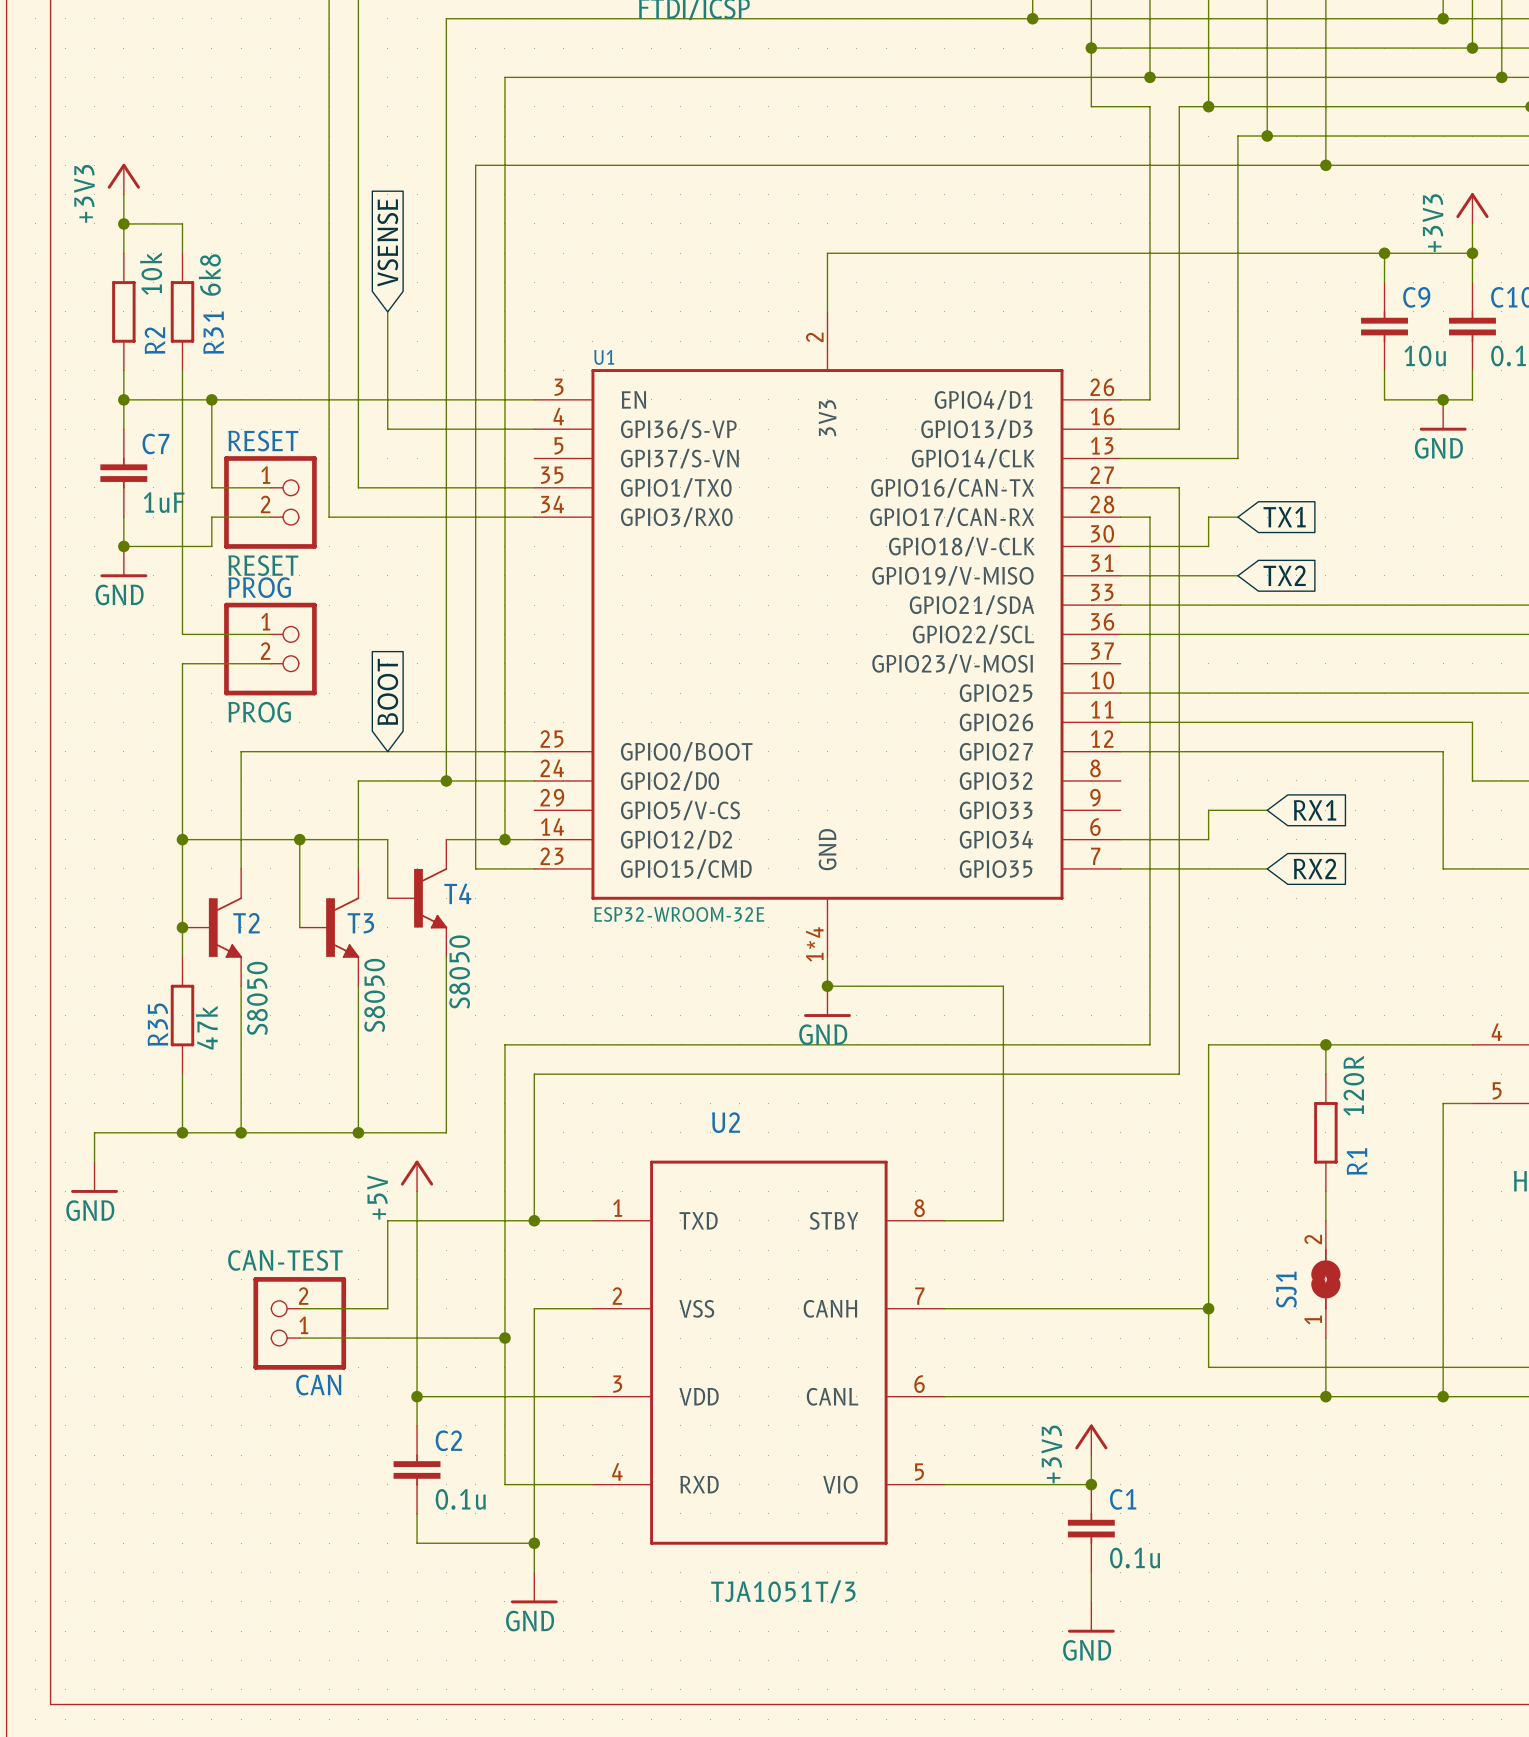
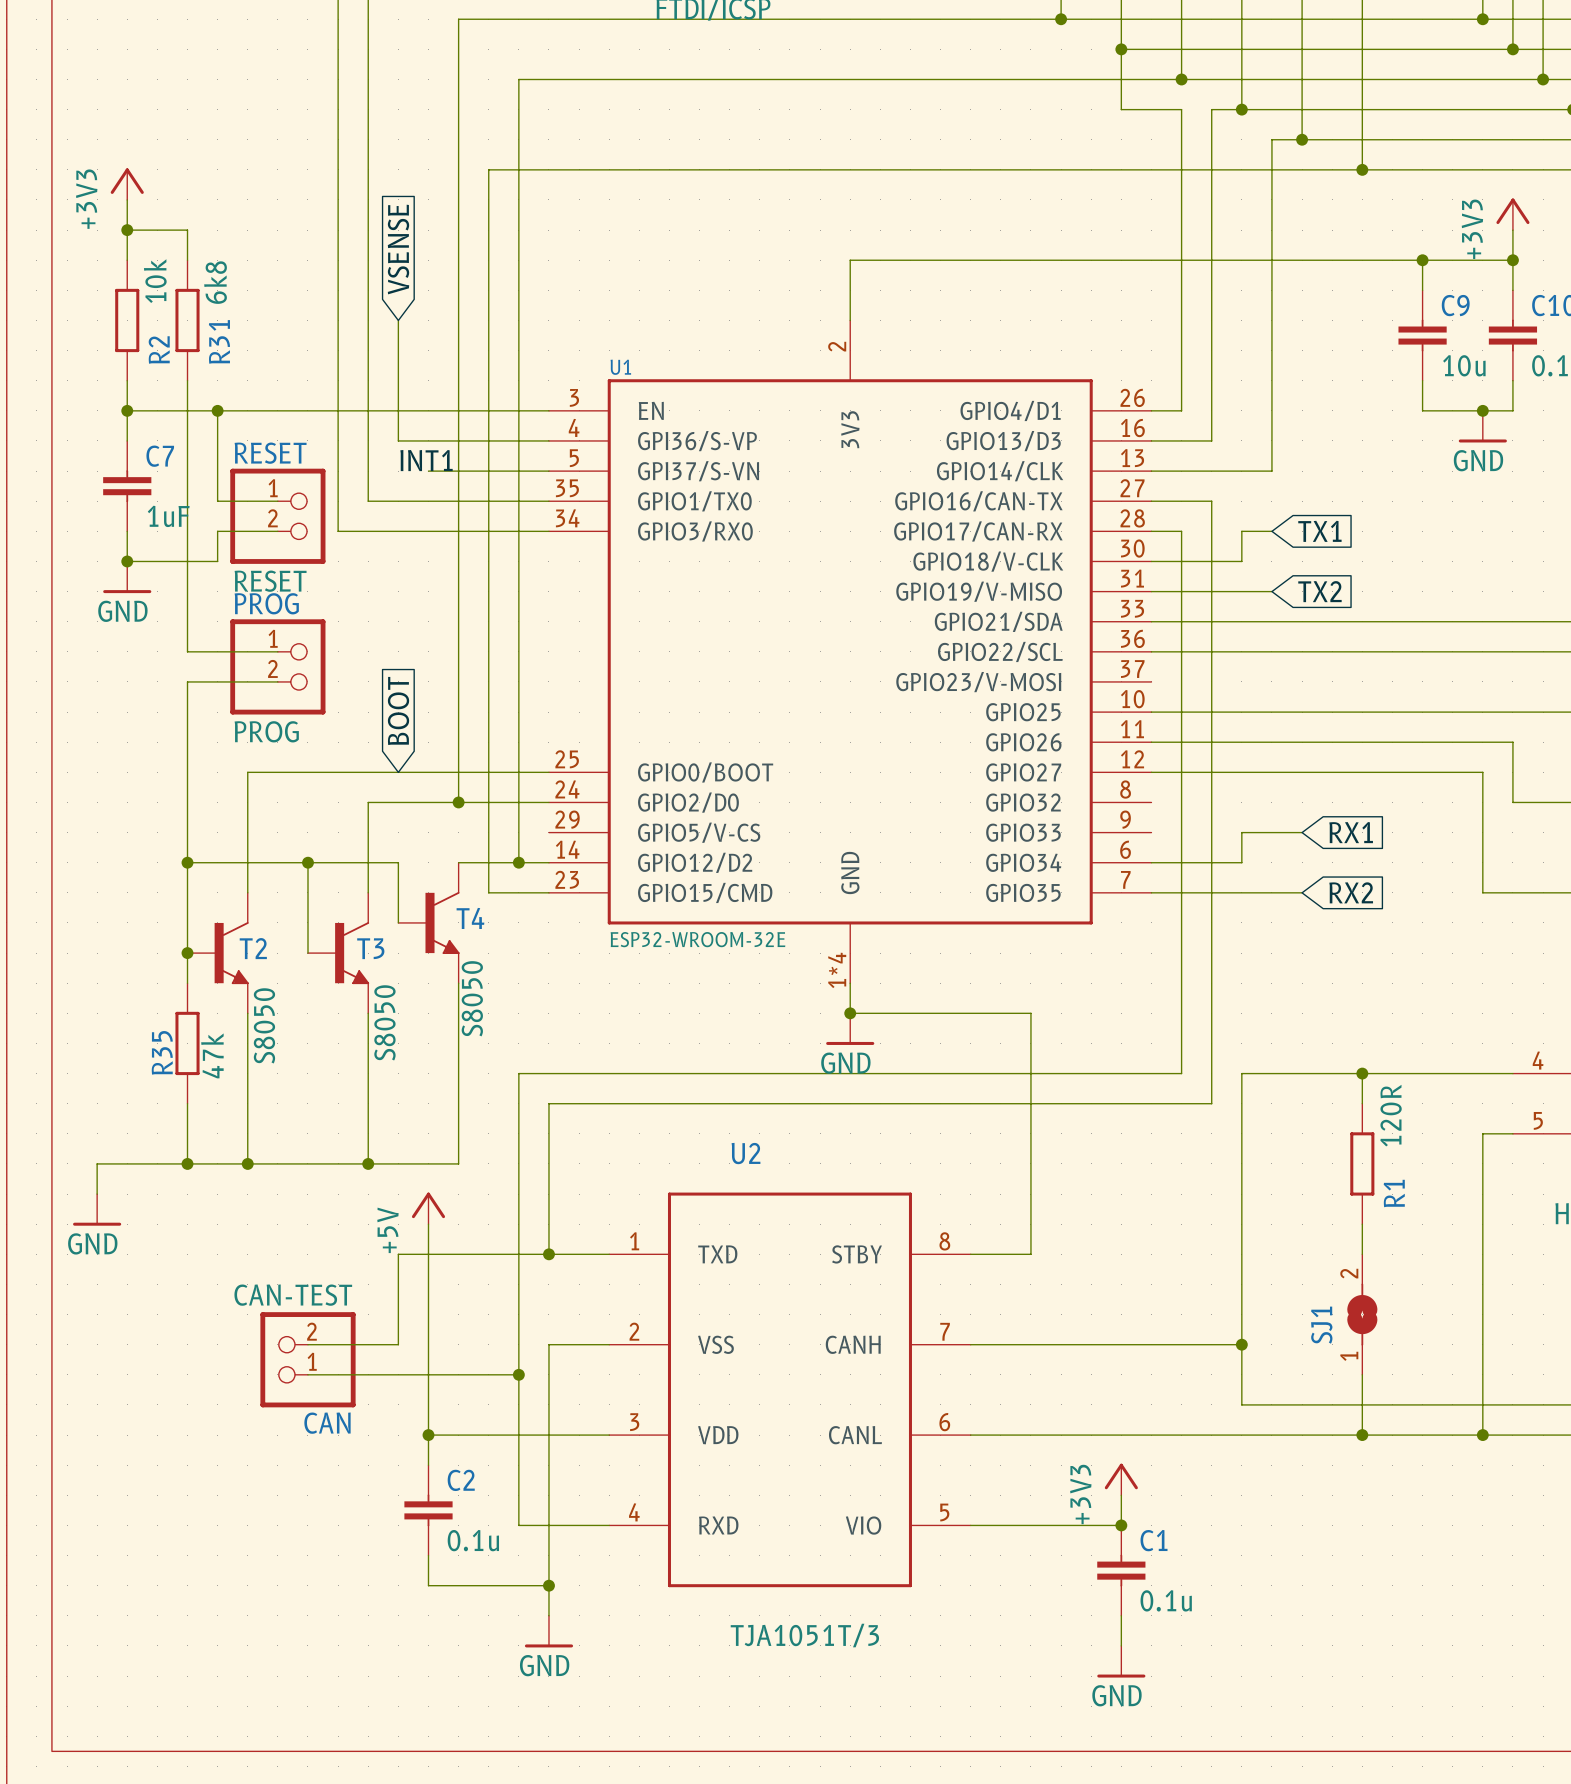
label: none -> INT1 (426, 460)
wire: none -> (428, 471) (548, 471)

